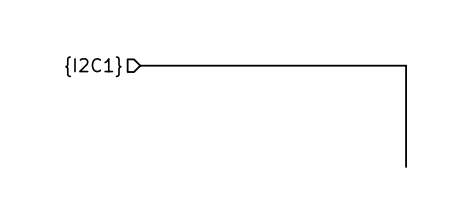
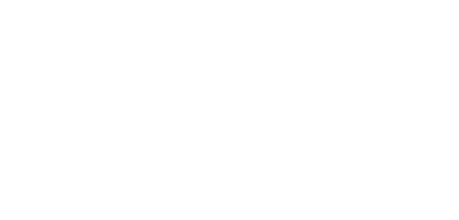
bus: (140, 65) (406, 65) (406, 166) -> none
hierarchical label: {I2C1} (93, 66) -> none

